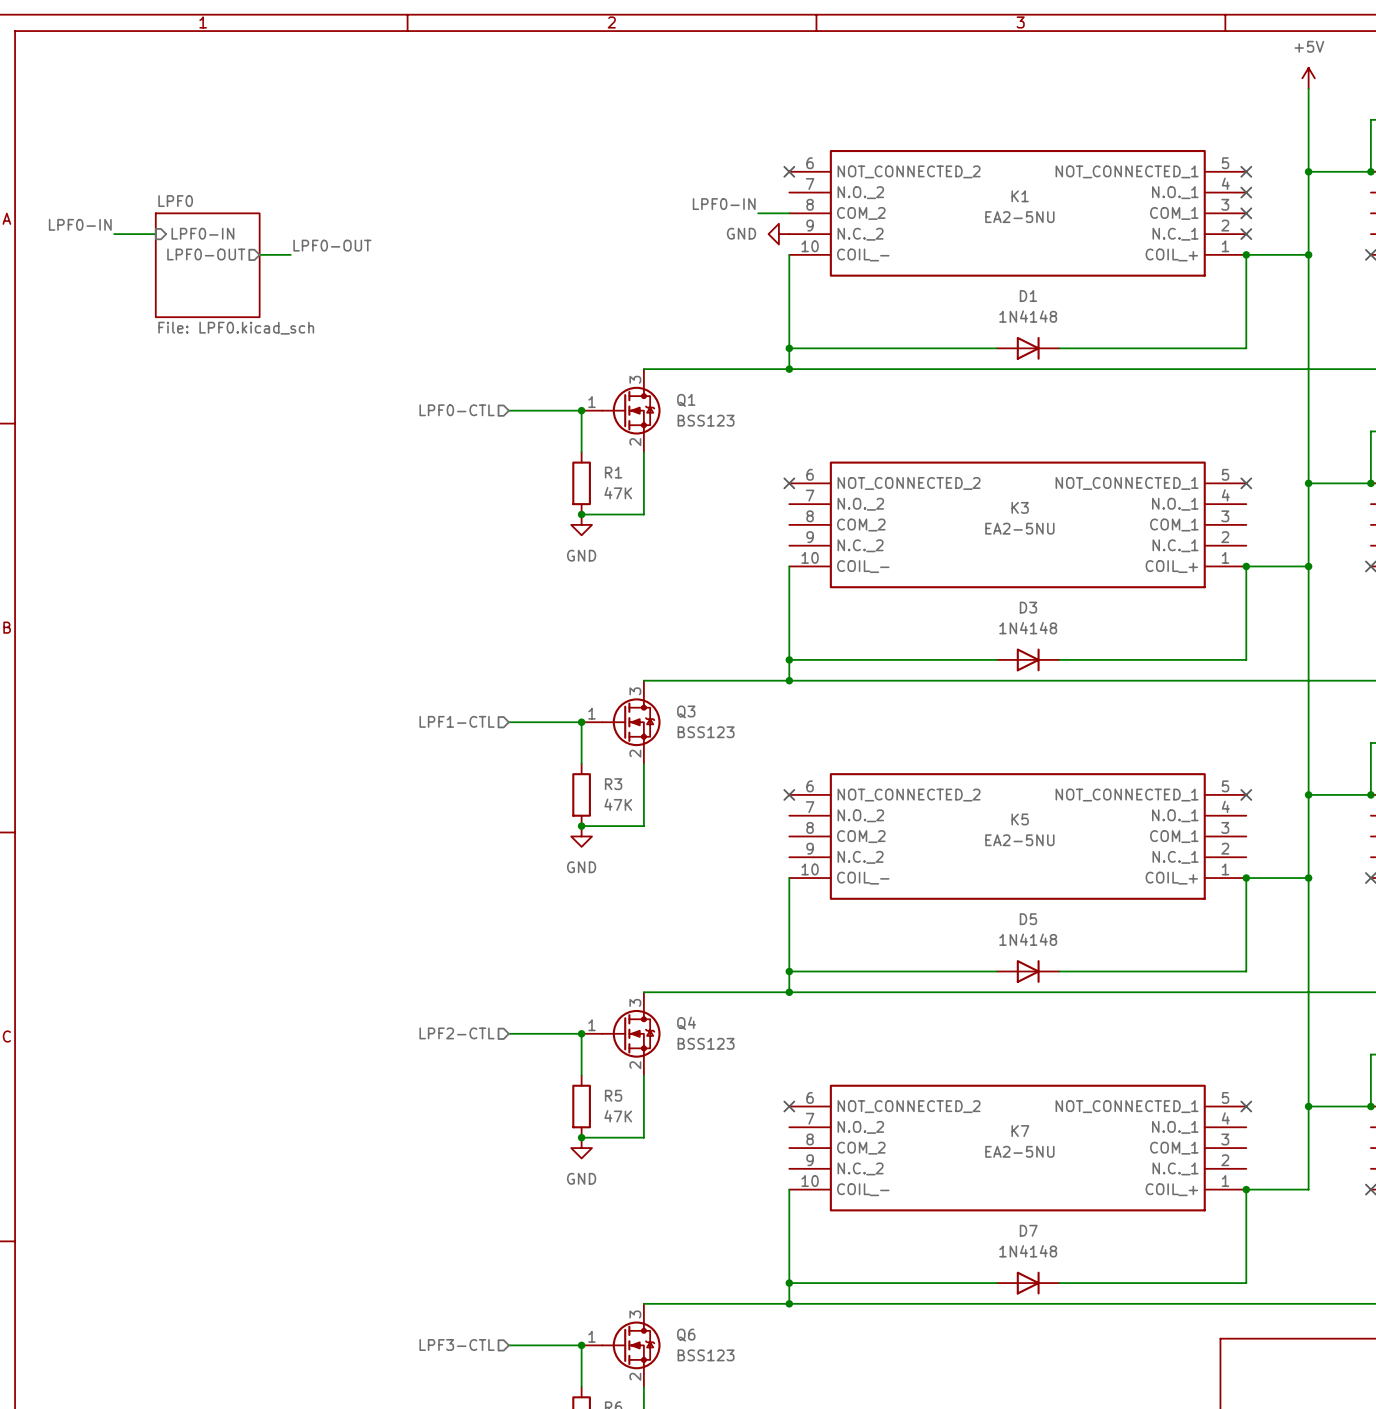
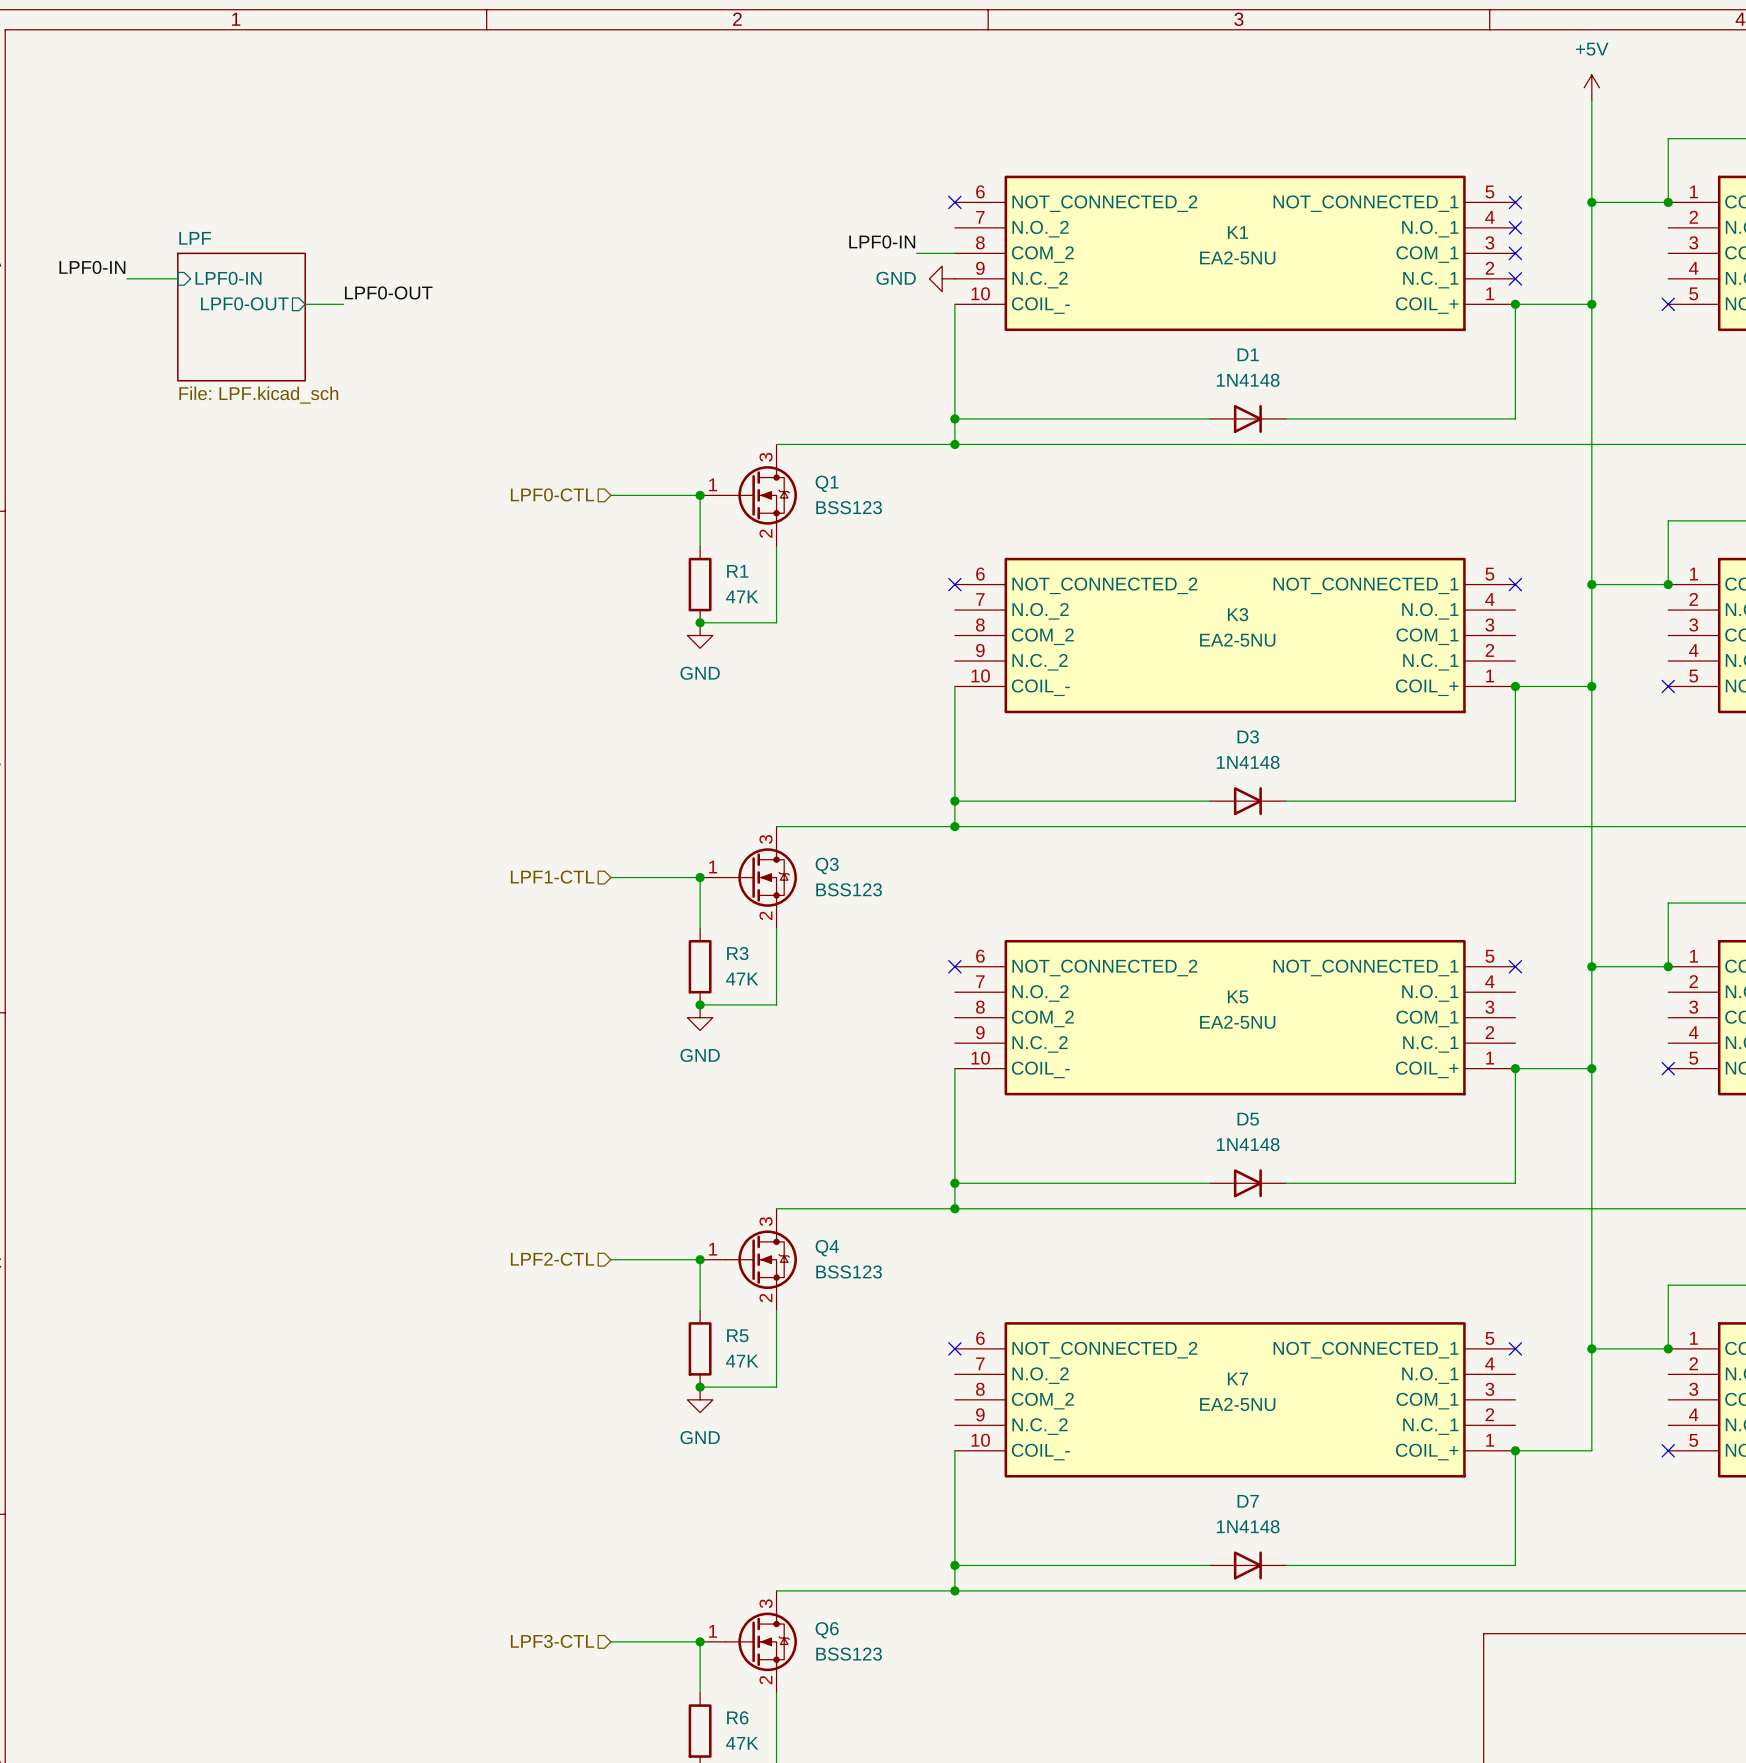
sheet LPF0 name: LPF0 (175, 201) -> LPF (195, 238)
sheet LPF0 value: File: LPF0.kicad_sch (236, 328) -> File: LPF.kicad_sch (258, 395)

